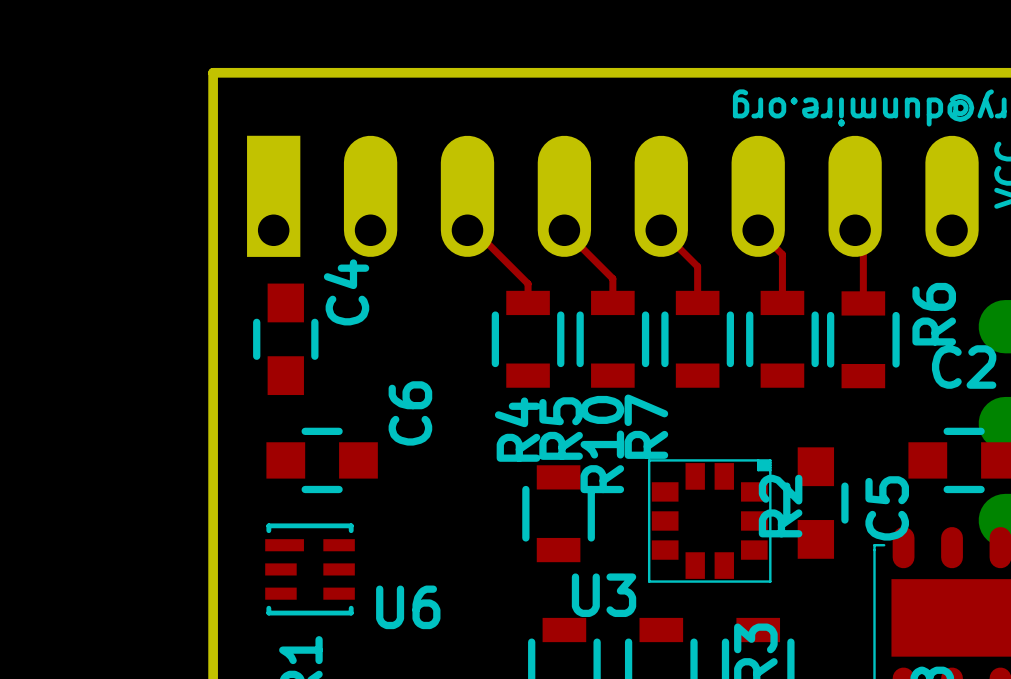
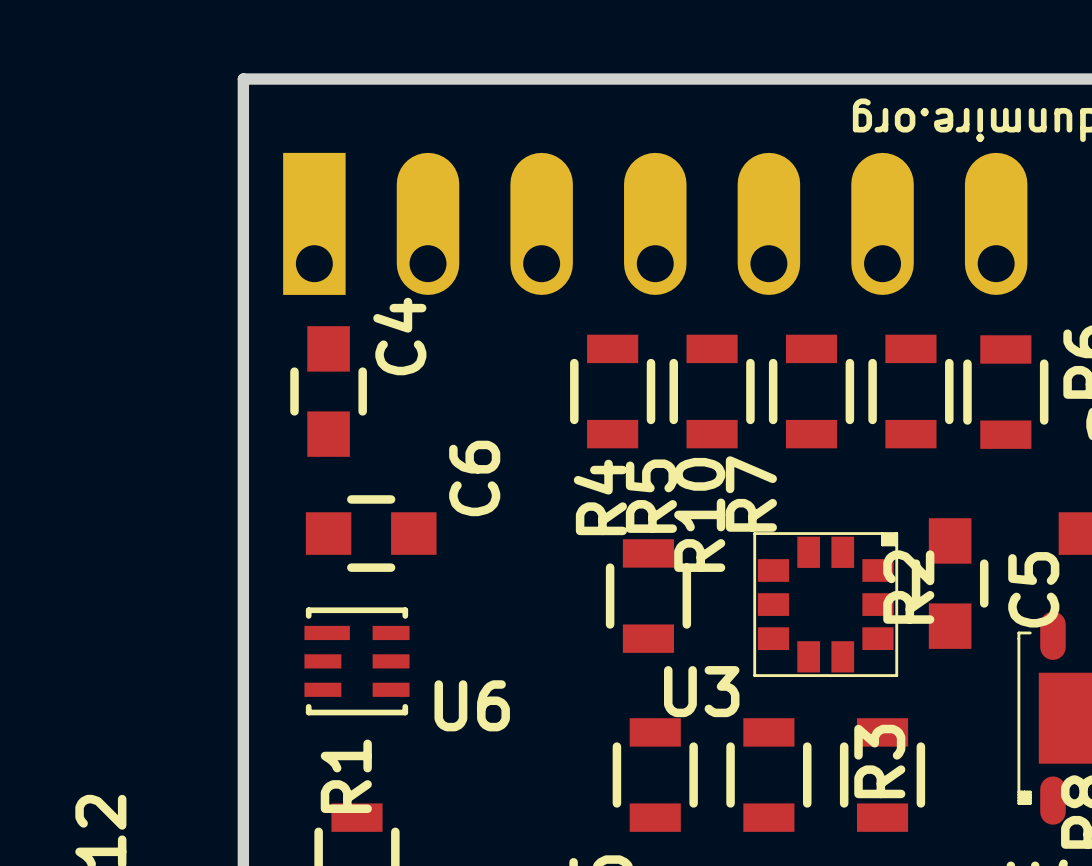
top track: (467, 230) (474, 230) (528, 283) (528, 302) -> none
top track: (564, 230) (612, 278) (612, 302) -> none
top track: (661, 230) (697, 266) (697, 302) -> none
top track: (758, 230) (782, 254) (782, 302) -> none
top track: (855, 230) (863, 238) (863, 303) -> none

